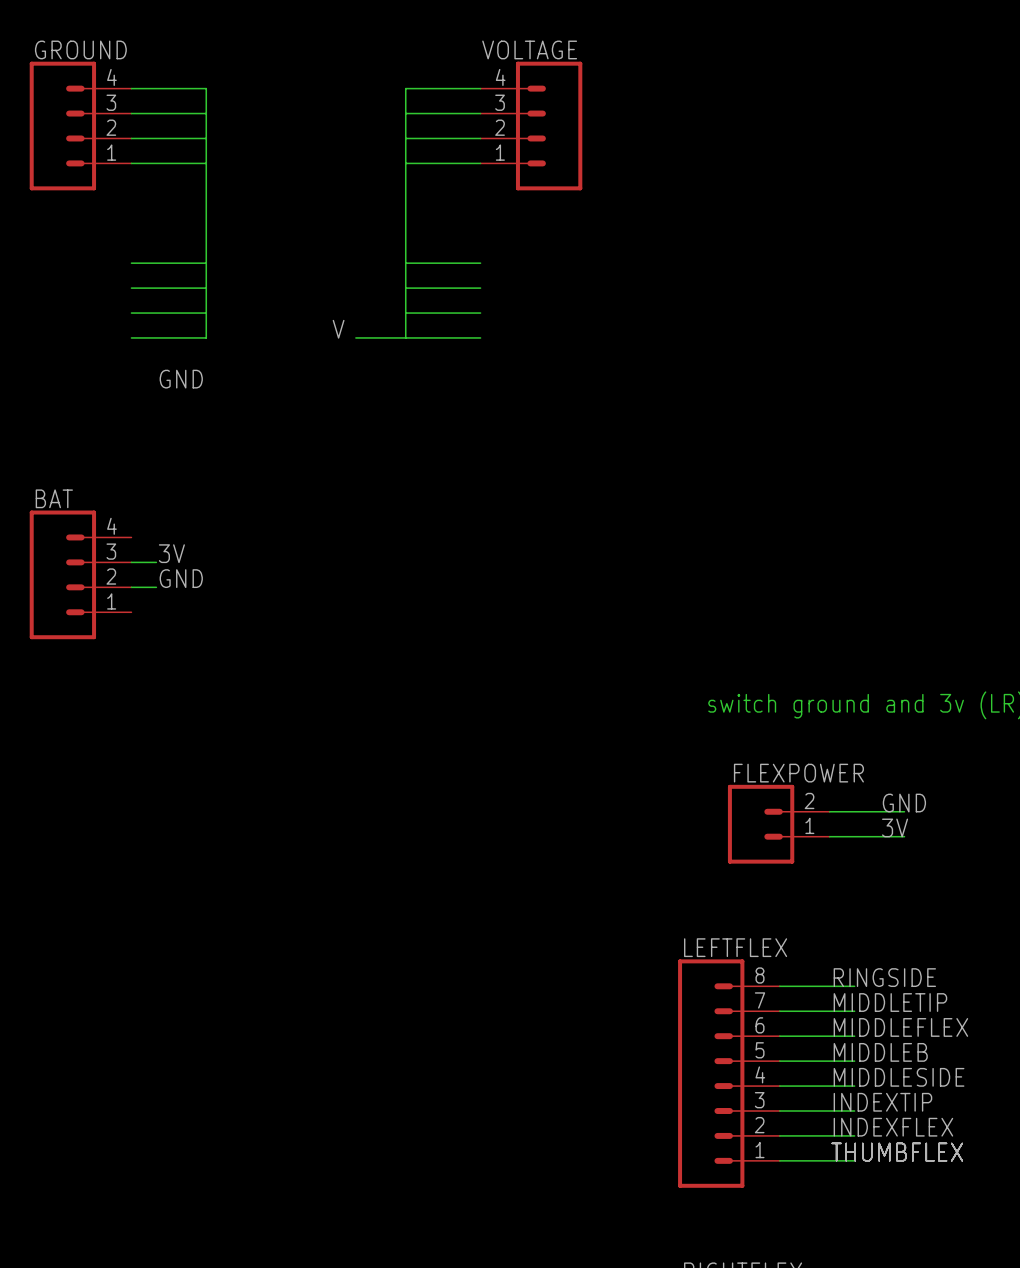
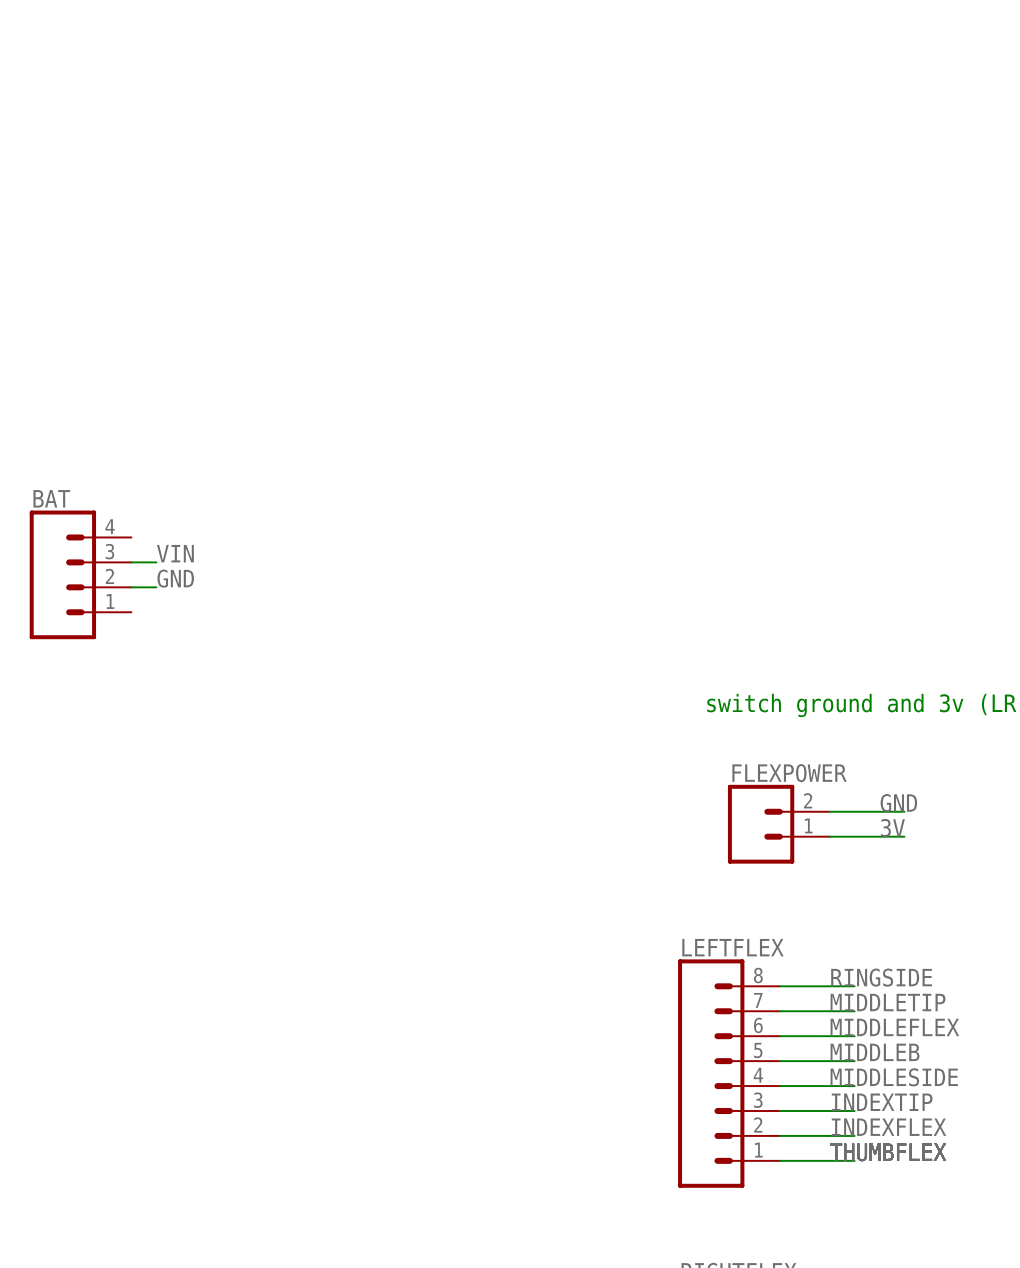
wire: (131, 88) (206, 88) (206, 337) (131, 337) -> none
wire: (480, 88) (405, 88) (405, 337) -> none
wire: (131, 113) (206, 113) -> none
wire: (405, 113) (480, 113) -> none
GROUND: (80, 126) -> none
VOLTAGE: (531, 126) -> none
wire: (131, 138) (206, 138) -> none
wire: (405, 138) (480, 138) -> none
wire: (131, 163) (206, 163) -> none
wire: (405, 163) (480, 163) -> none
wire: (131, 263) (206, 263) -> none
wire: (405, 263) (480, 263) -> none
wire: (131, 288) (206, 288) -> none
wire: (405, 288) (480, 288) -> none
wire: (131, 313) (206, 313) -> none
wire: (405, 313) (480, 313) -> none
label: V (338, 329) -> none
wire: (355, 337) (480, 337) -> none
label: GND (181, 379) -> none
label: 3V (171, 553) -> VIN (175, 553)

